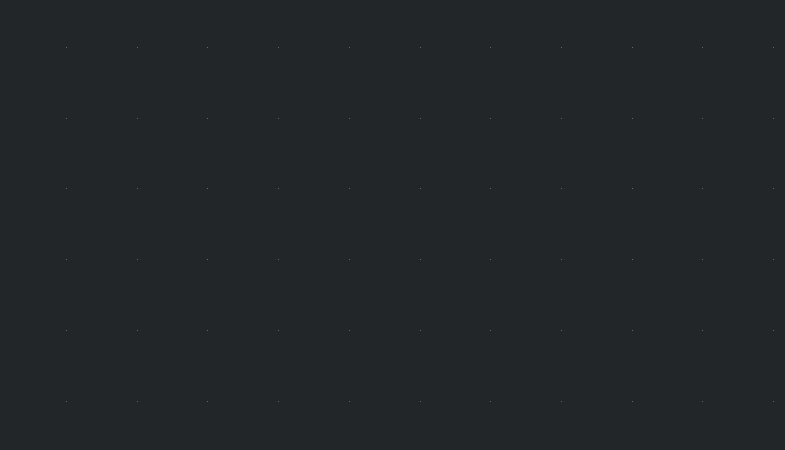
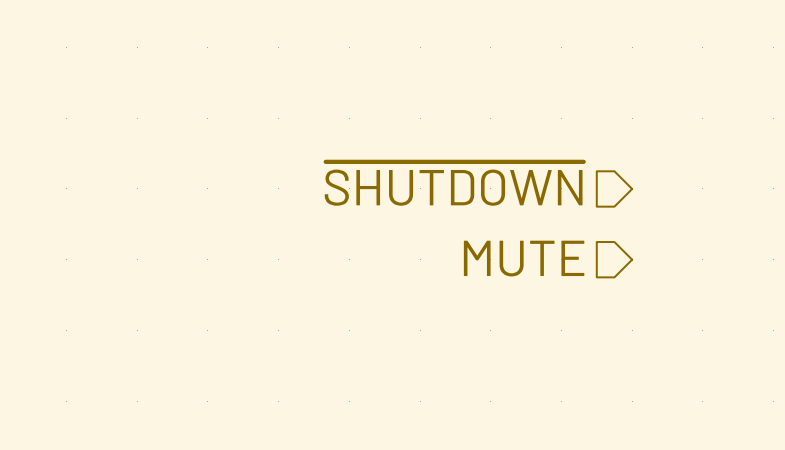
hierarchical label: none -> ~{SHUTDOWN} (454, 183)
hierarchical label: none -> MUTE (524, 258)

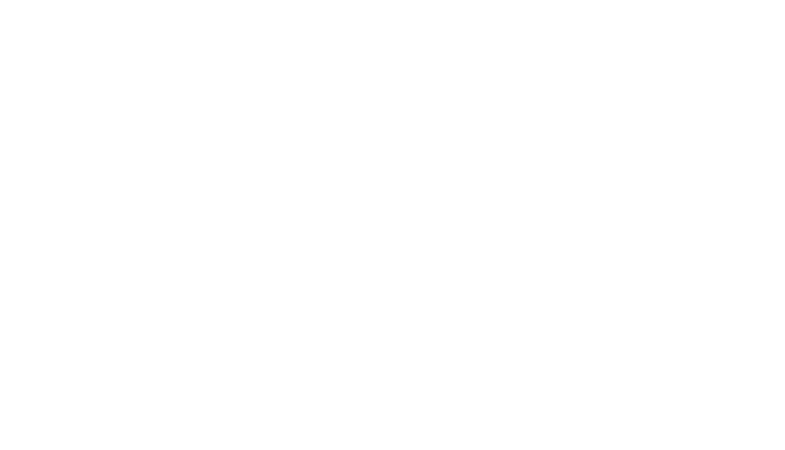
hierarchical label: ~{SHUTDOWN} (454, 183) -> none
hierarchical label: MUTE (524, 258) -> none

